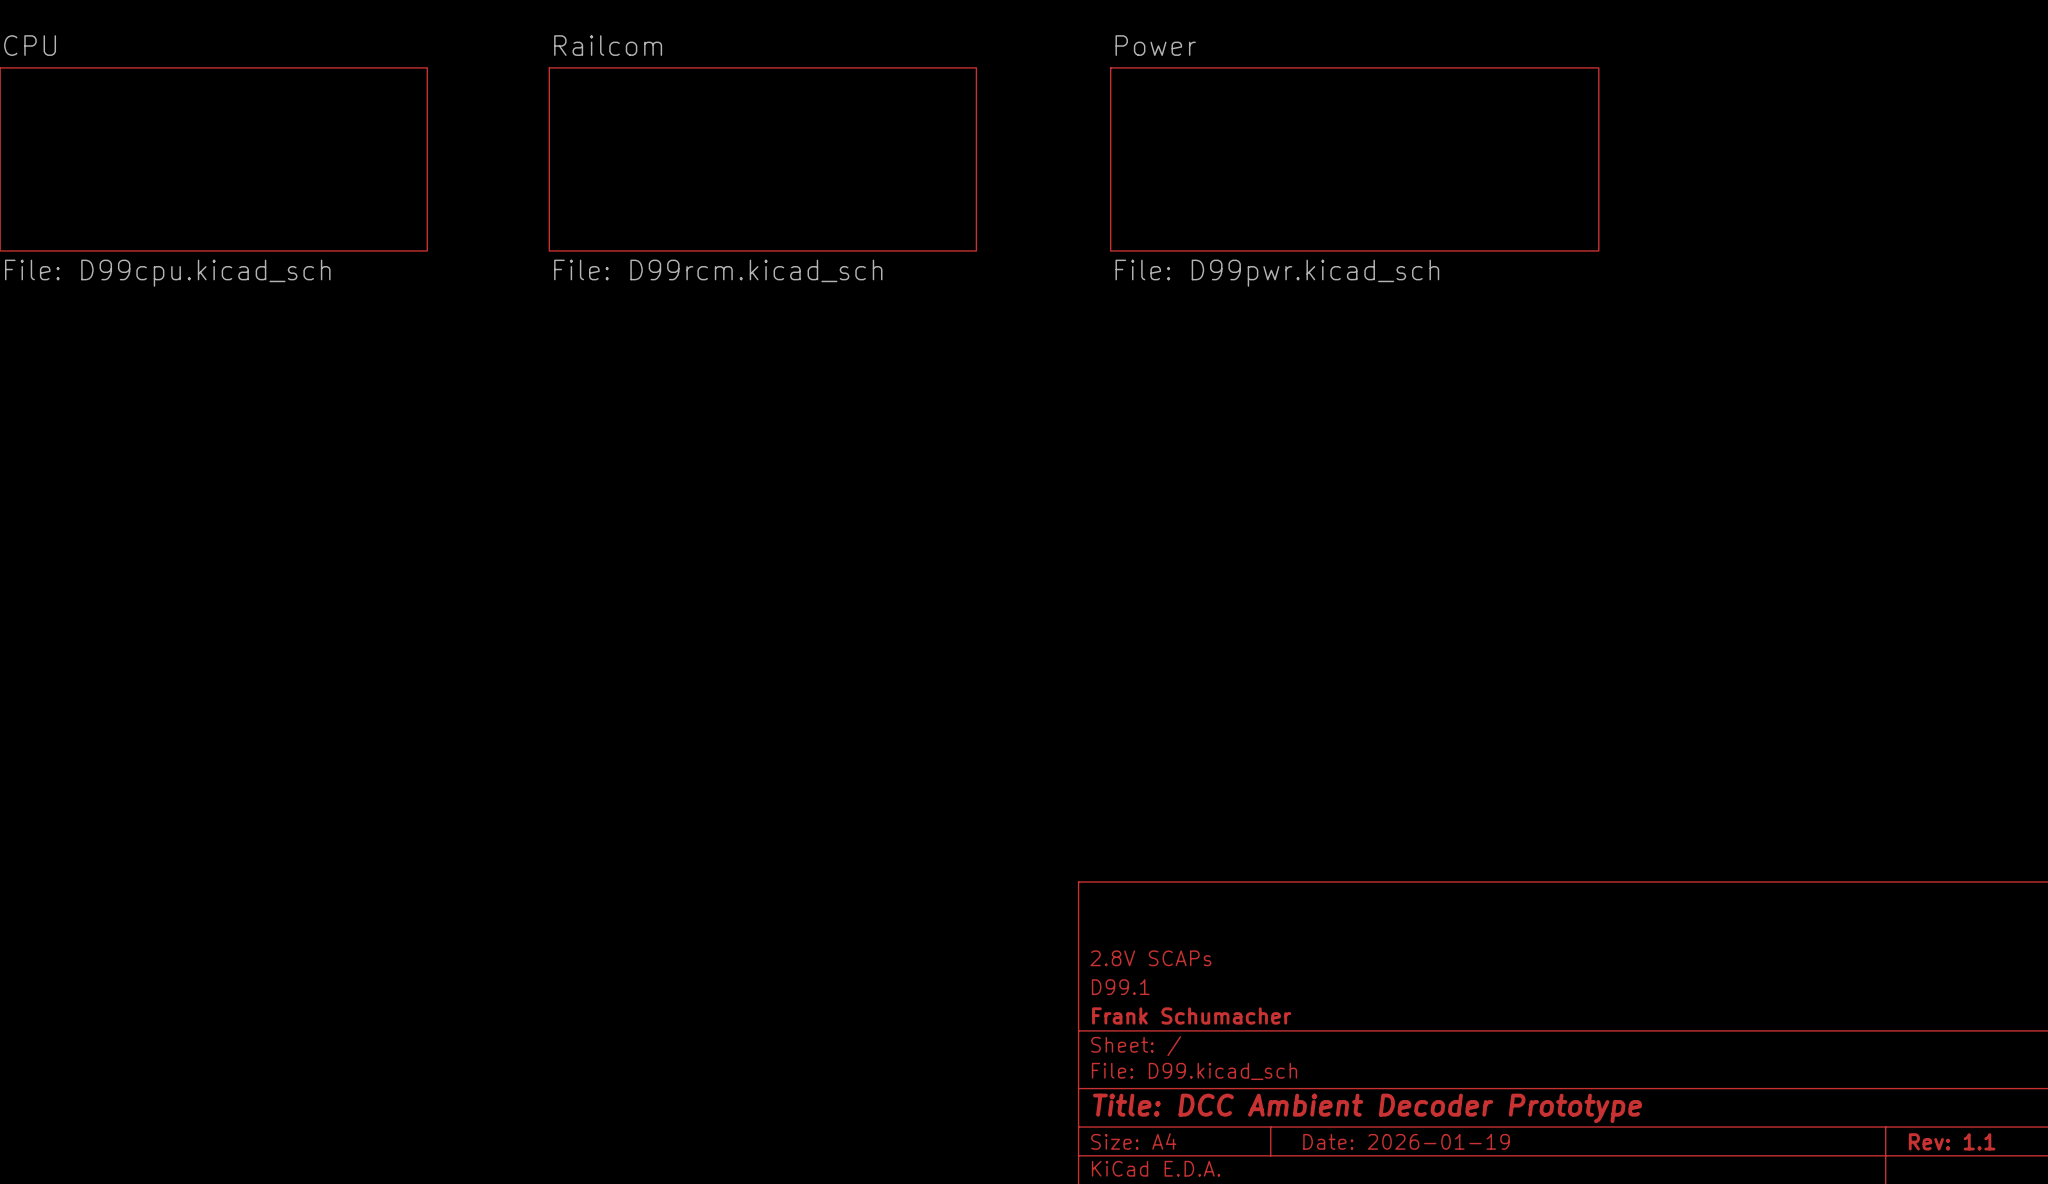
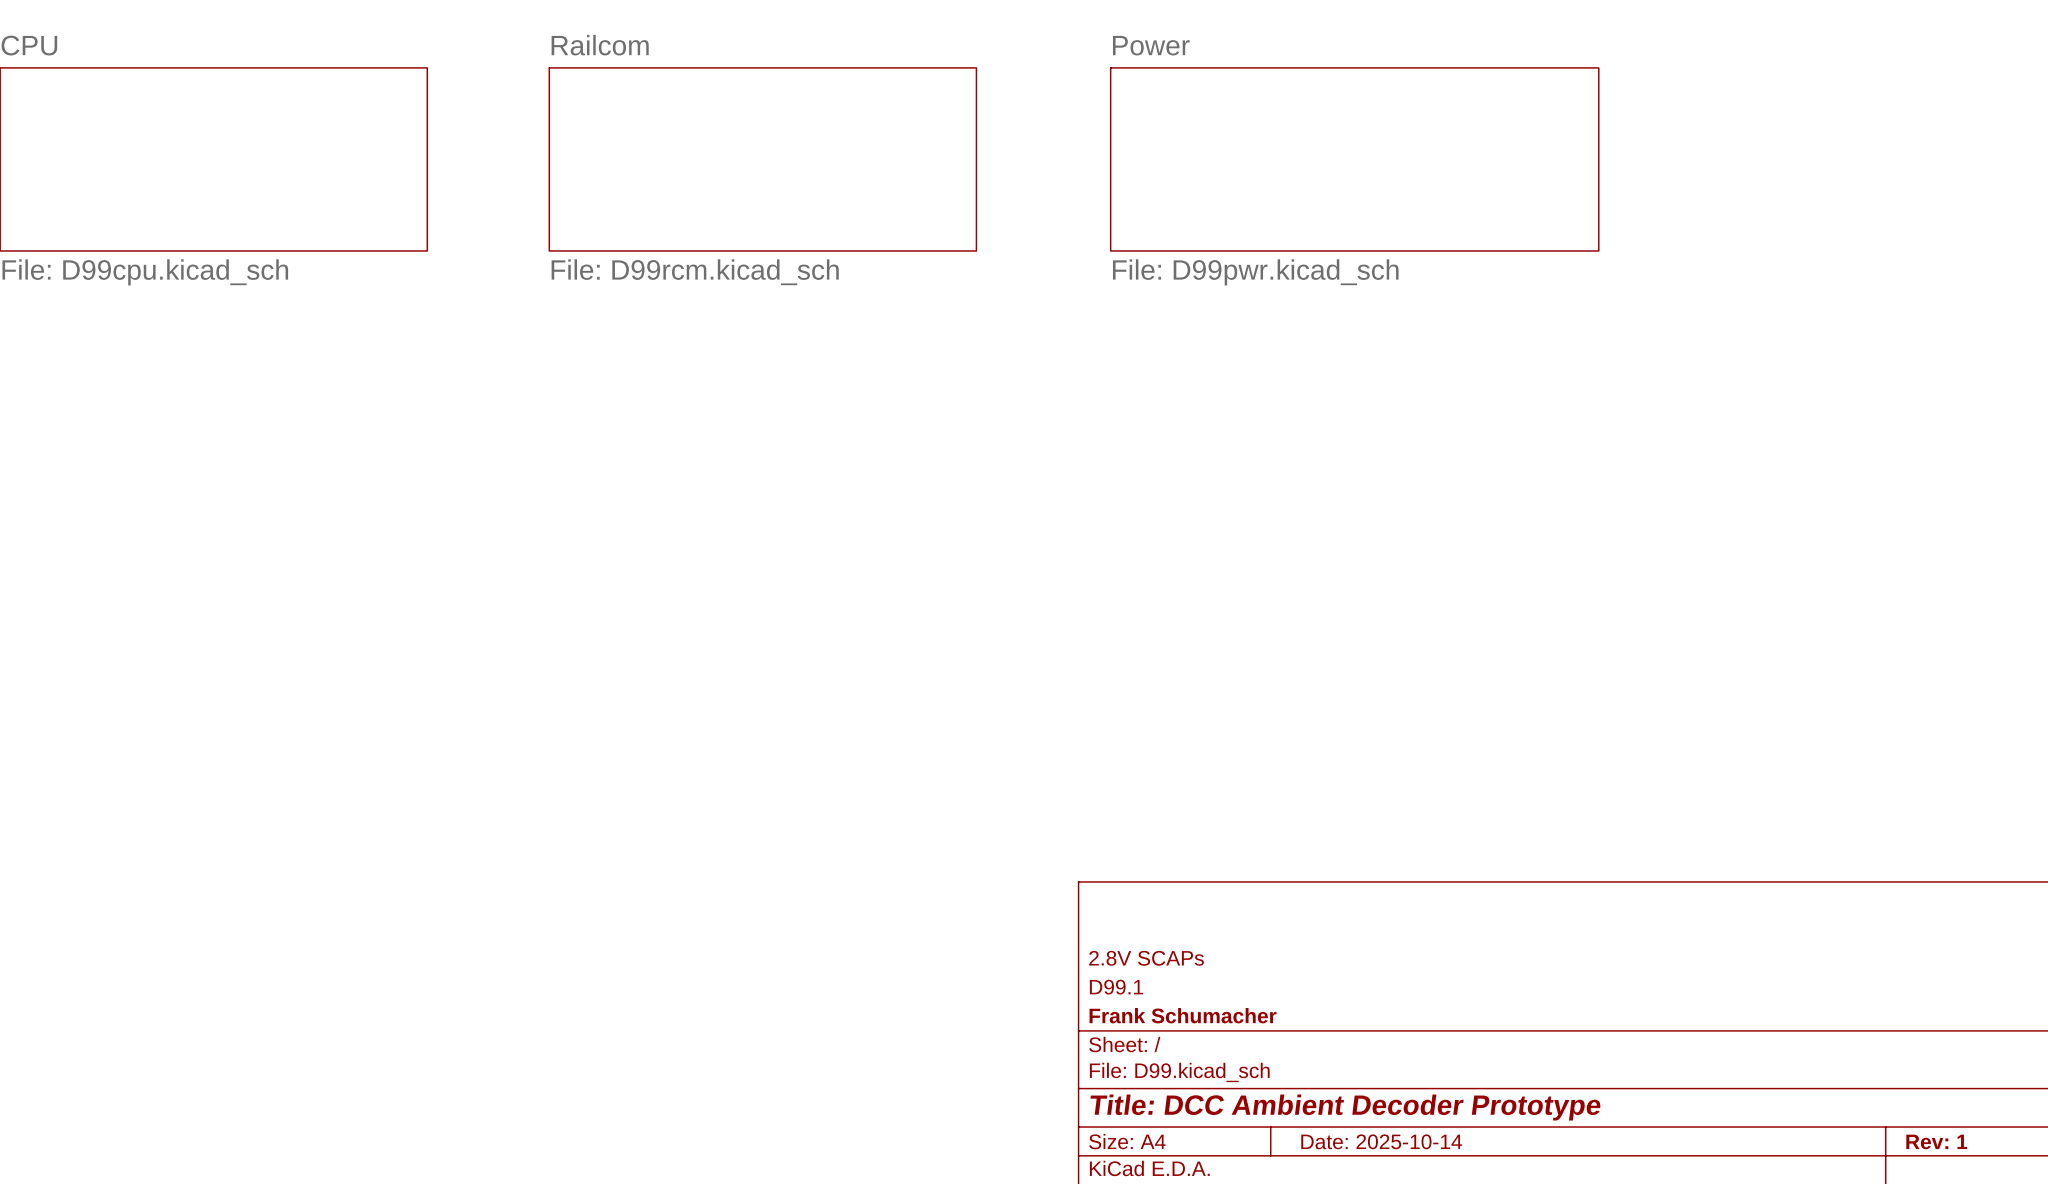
title block: Date: 2026-01-19 (1406, 1141) -> Date: 2025-10-14 (1381, 1141)
title block: Rev: 1.1 (1952, 1141) -> Rev: 1 (1936, 1141)

